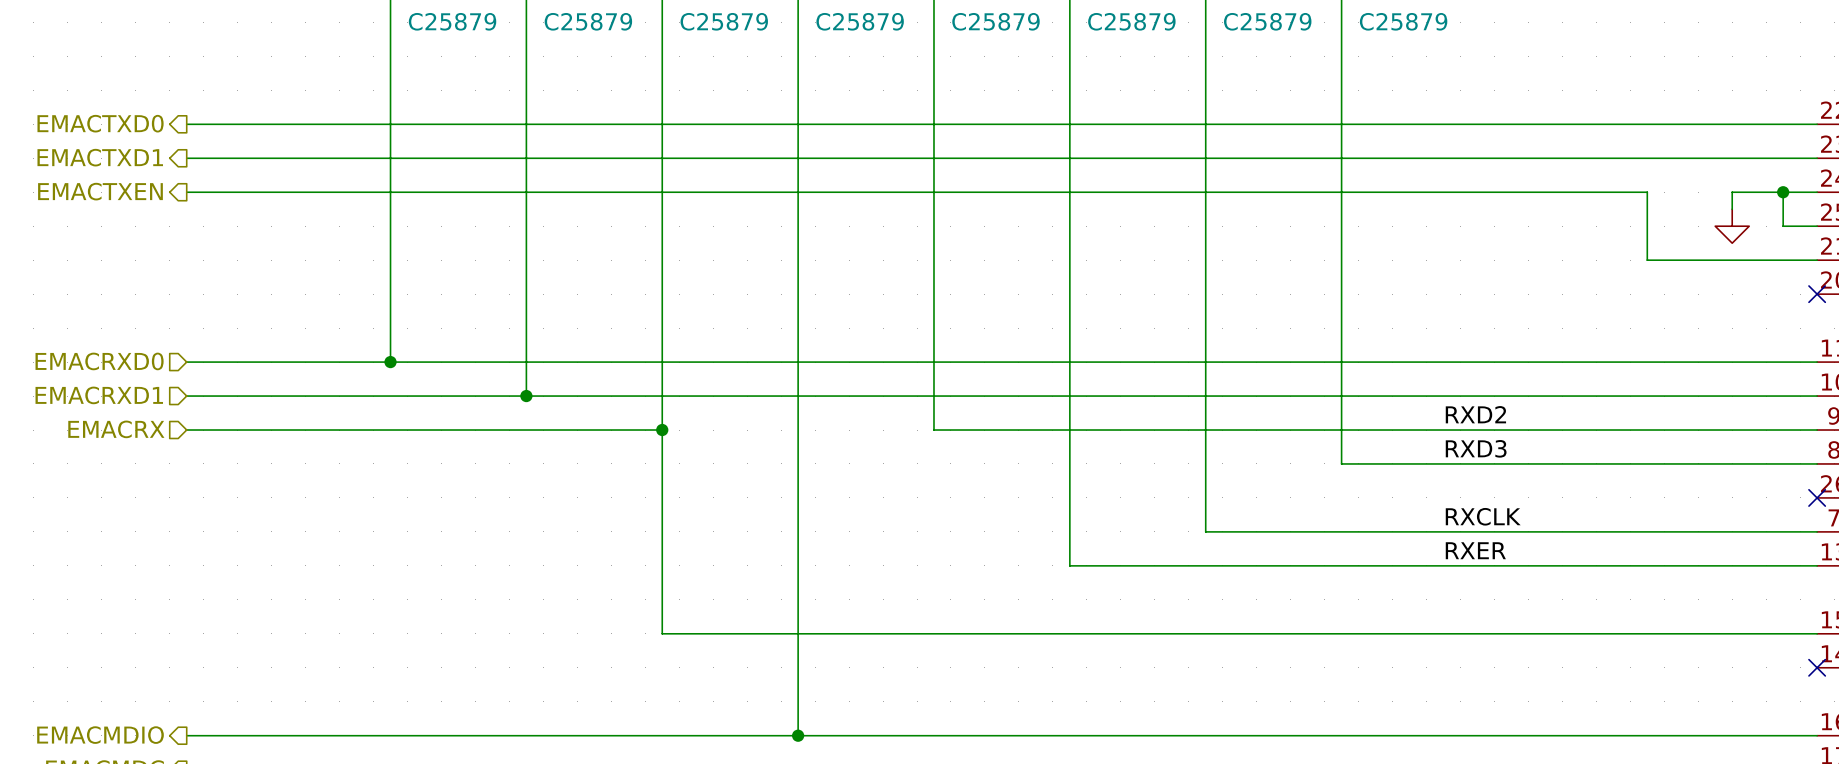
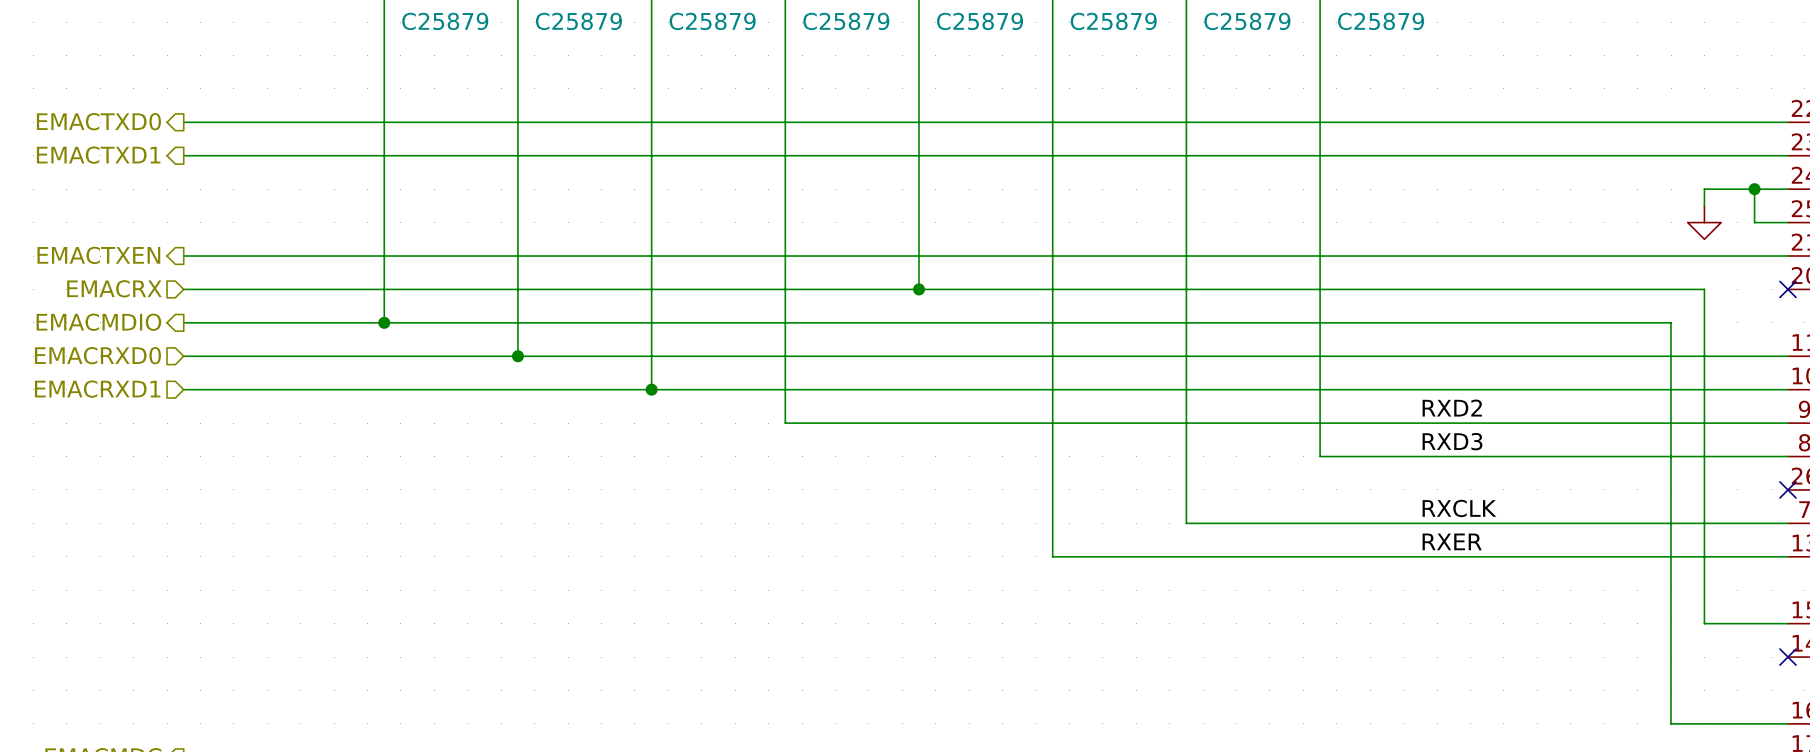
hierarchical label position: EMACTXEN (100, 191) -> EMACTXEN (98, 255)
wire: (186, 192) (1647, 192) (1647, 260) -> (183, 256) (1620, 256)
wire: (933, 294) (933, 430) -> (785, 423) (919, 423)
junction: none -> (919, 289)
hierarchical label: none -> EMACMDIO (98, 322)
wire: (390, 328) (390, 362) -> none
junction position: (390, 362) -> (384, 322)
wire: (526, 362) (526, 396) -> none
junction position: (526, 396) -> (517, 356)
wire: (662, 396) (662, 633) (1732, 633) -> (183, 289) (1704, 289) (1704, 623)
hierarchical label position: EMACRX (116, 429) -> EMACRX (114, 288)
wire: (186, 430) (662, 430) -> none
junction position: (662, 430) -> (651, 389)
wire: (798, 430) (798, 735) -> none
hierarchical label: EMACMDIO (100, 735) -> none
wire: (186, 735) (1698, 735) -> (183, 322) (1671, 322) (1671, 723)
junction: (798, 735) -> none

